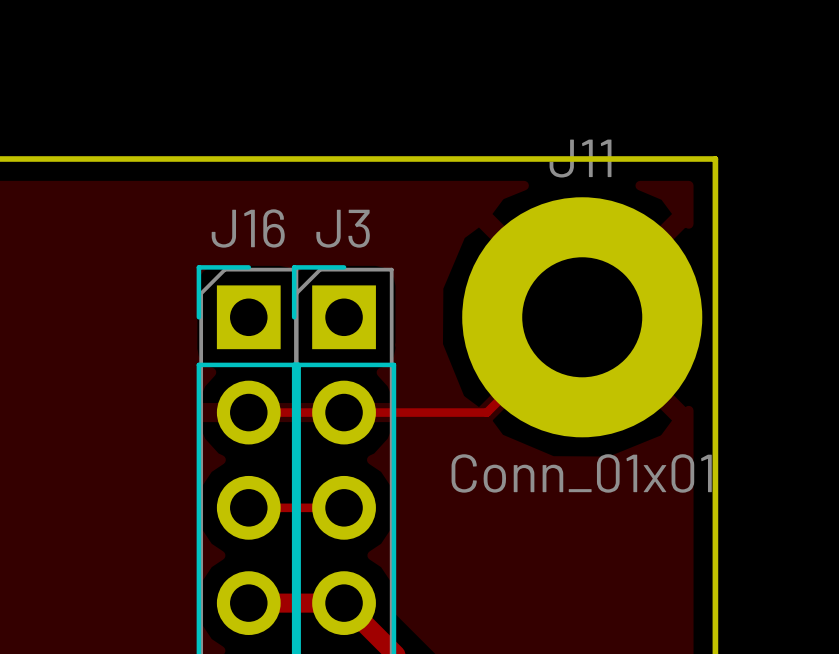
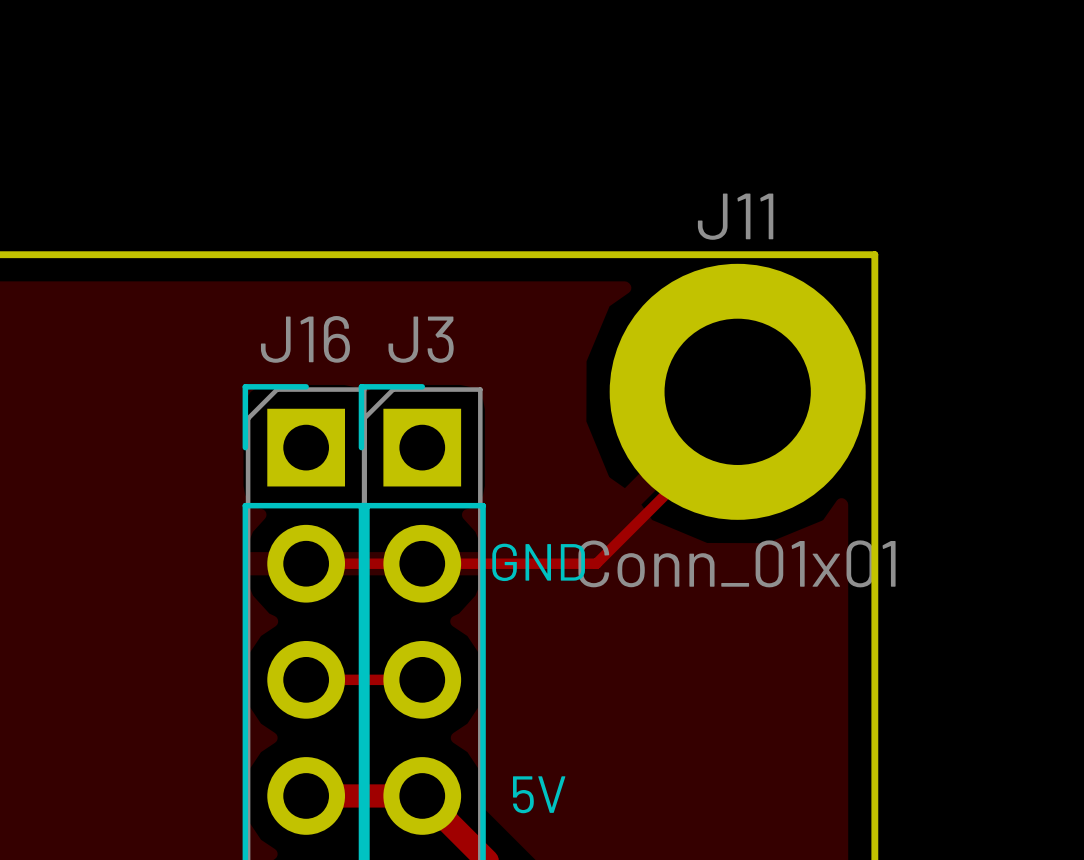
J11 footprint: [462, 197, 703, 438] -> [609, 263, 866, 520]
text: none -> GND (538, 562)
text: none -> 5V (539, 794)

